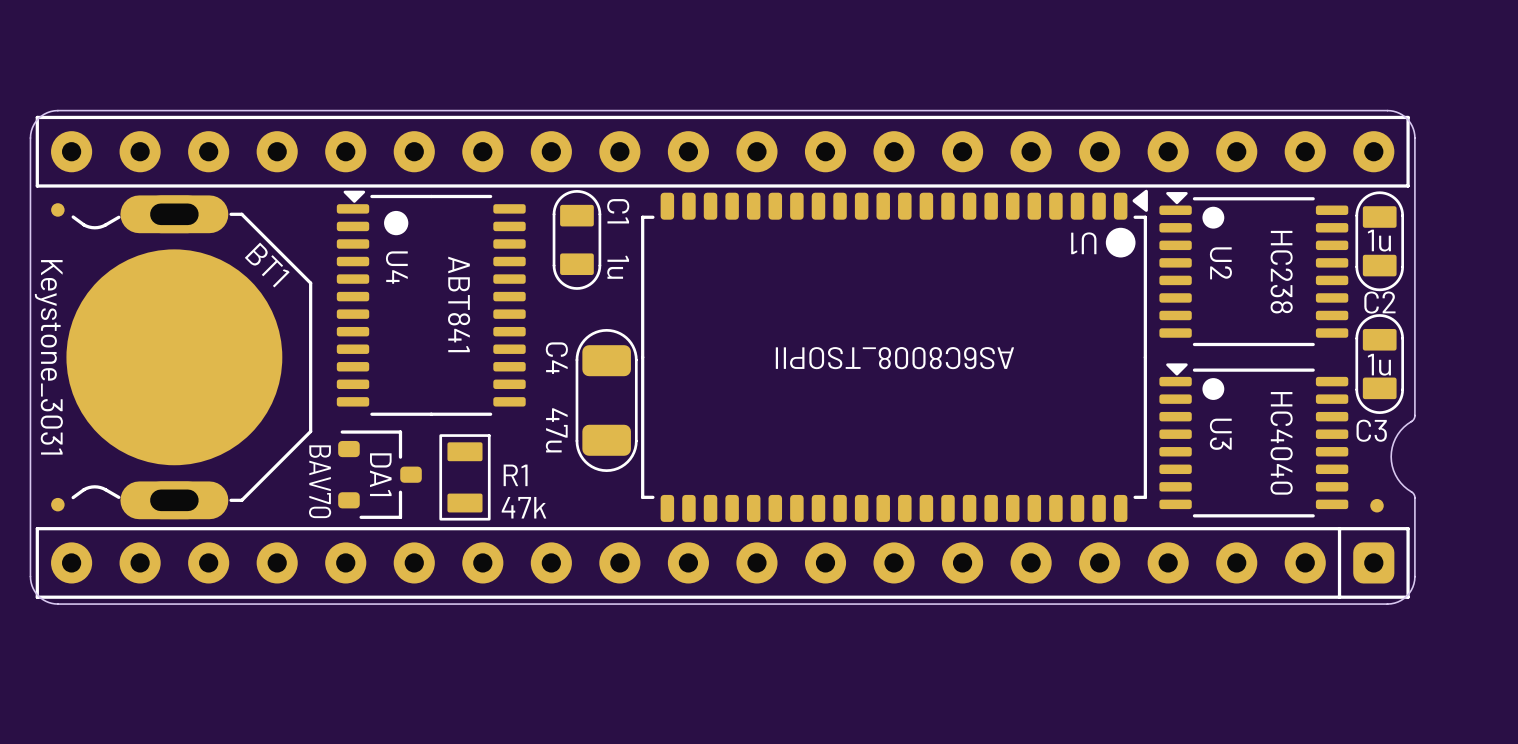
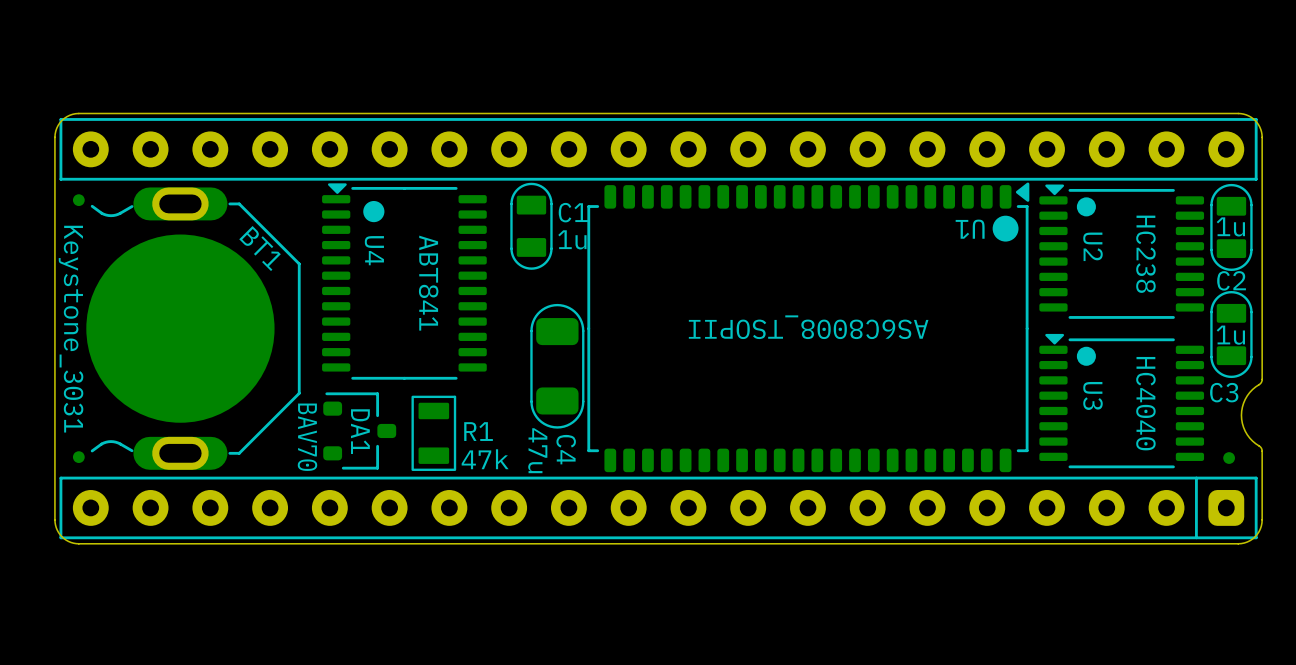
C1 name rotation: 0° (618, 211) -> 90° counterclockwise (573, 212)
C1 value rotation: 0° (618, 267) -> 90° counterclockwise (572, 239)
C4 name position: C4 (556, 358) -> C4 (566, 449)
C4 value position: 47u (556, 430) -> 47u (537, 450)

